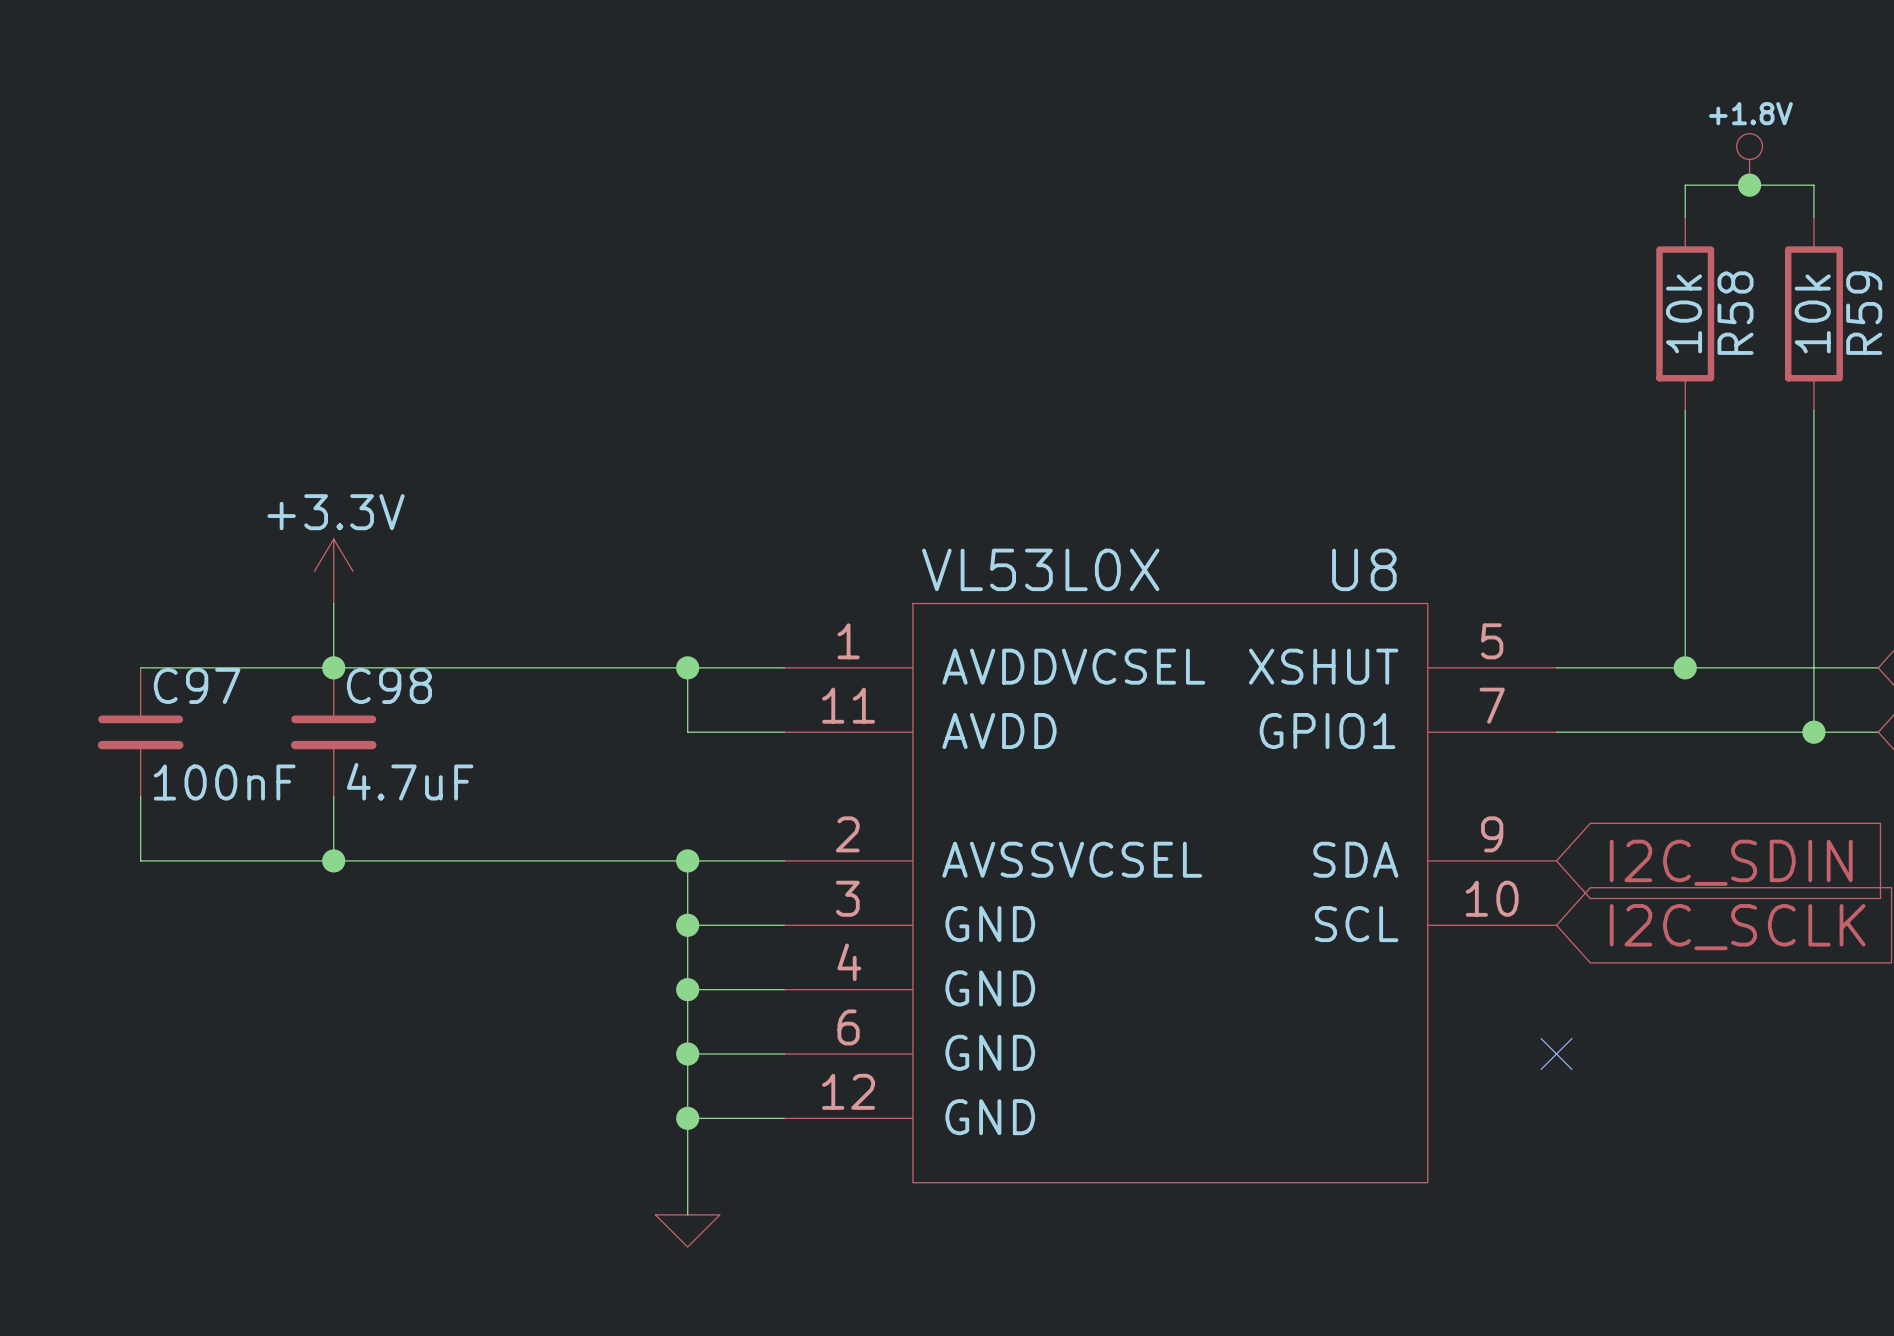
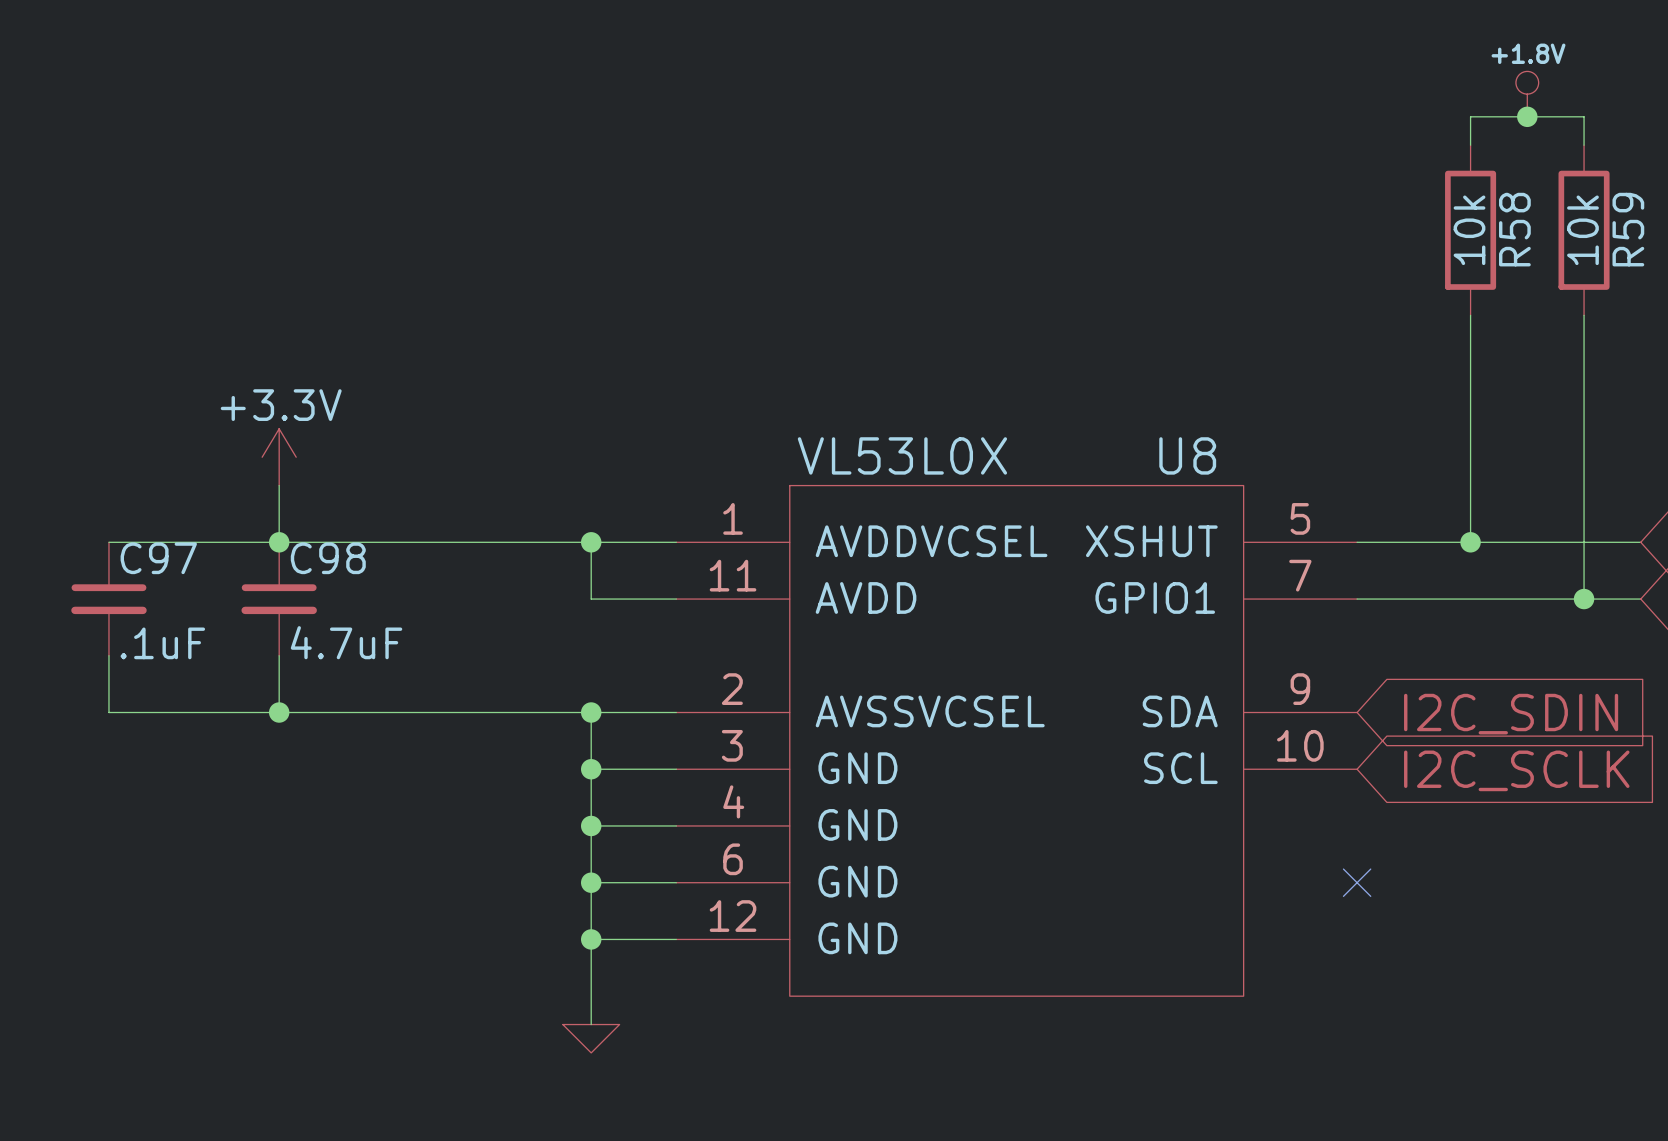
C97 value: 100nF (224, 782) -> .1uF (162, 643)

